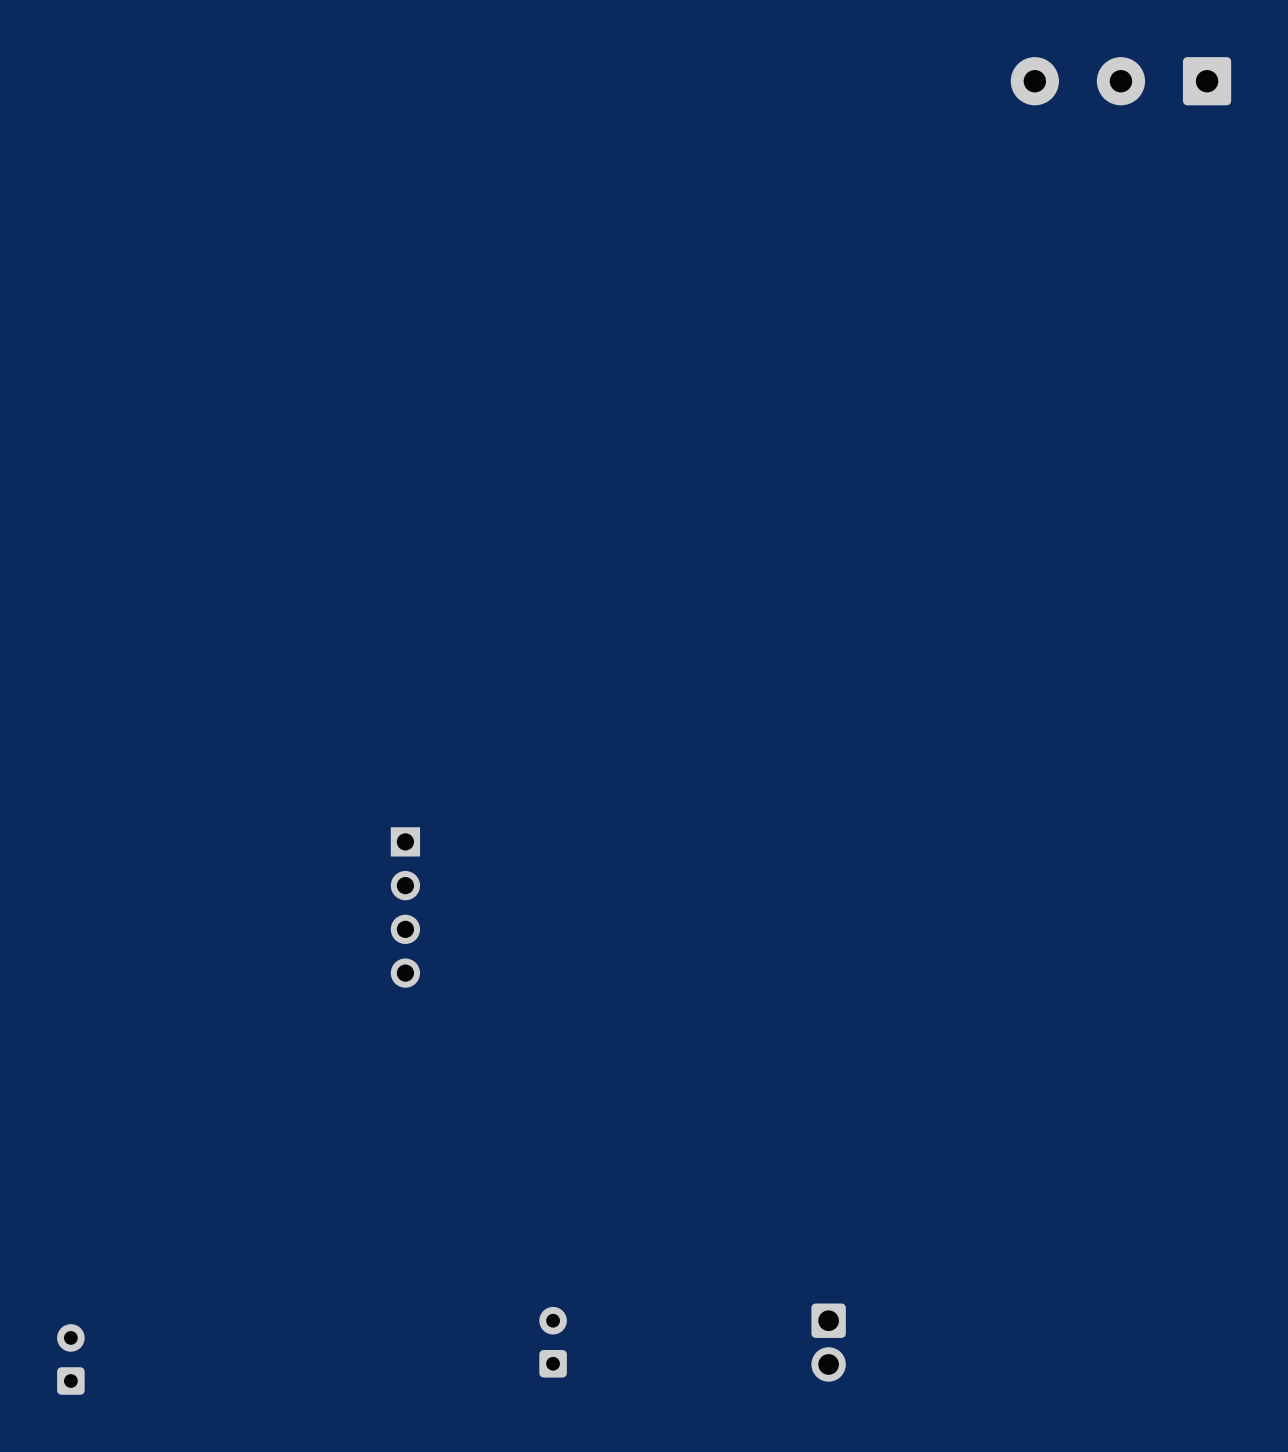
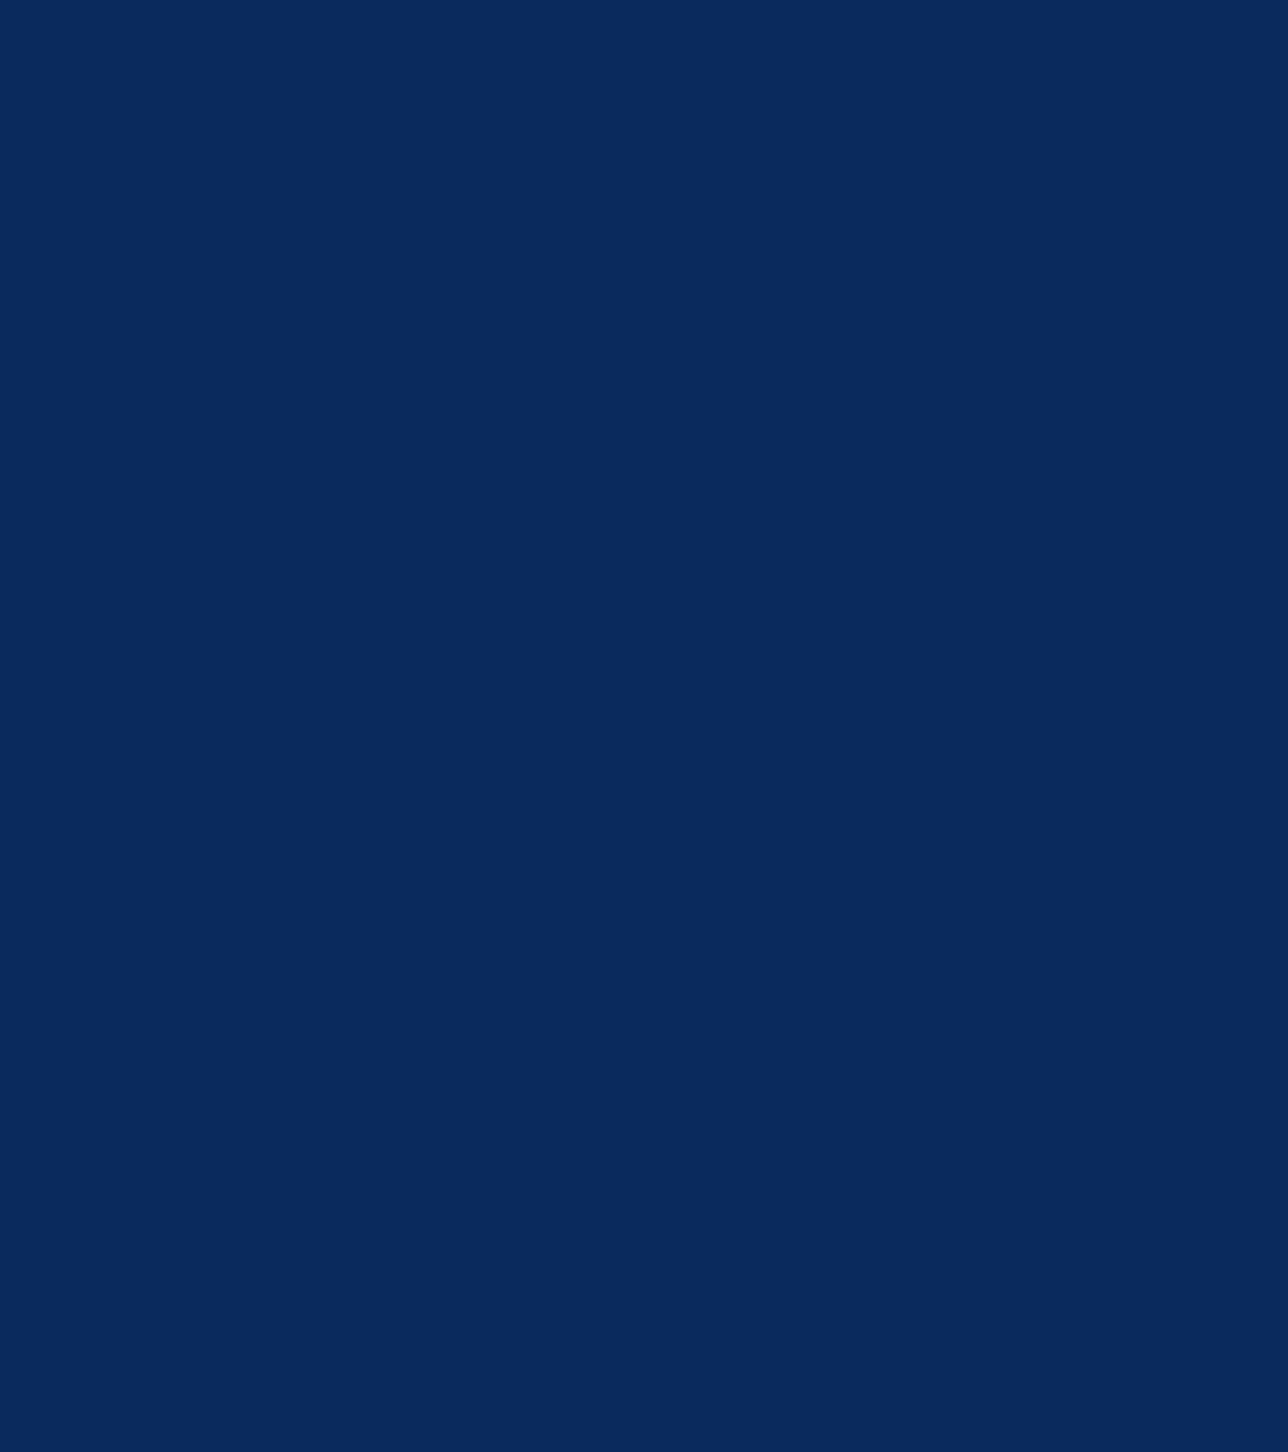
part: (1120, 81) -> none
part: (405, 907) -> none
part: (553, 1342) -> none
part: (828, 1342) -> none
part: (70, 1359) -> none

